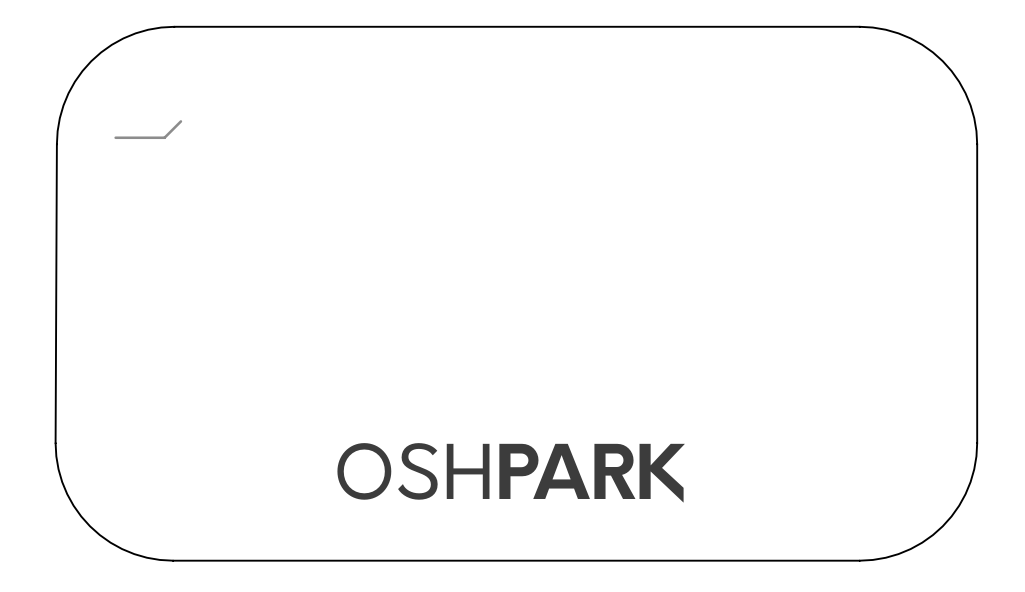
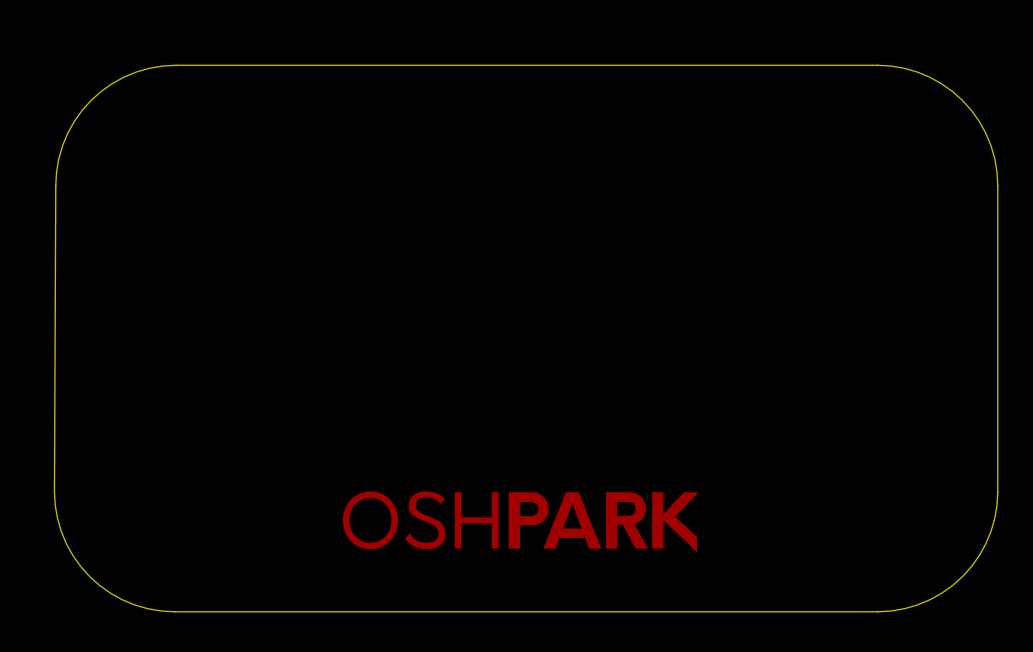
part: (148, 129) -> none
drawing shape: [337, 443, 685, 503] -> [342, 491, 699, 553]

